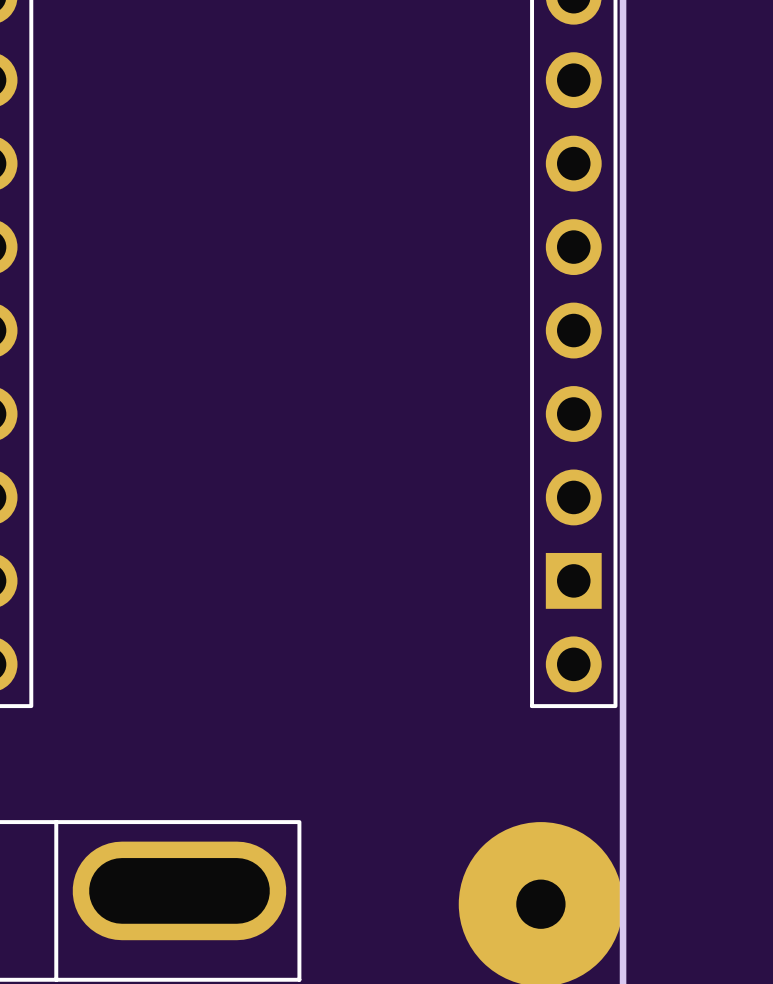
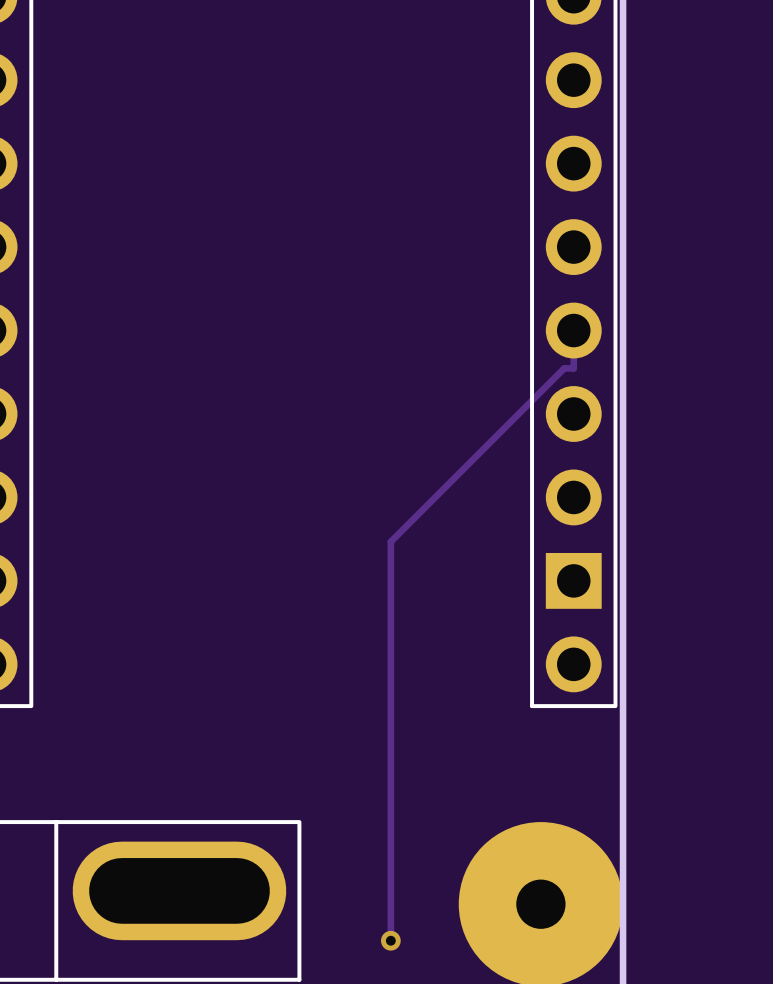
track: none -> (573, 330) (573, 368) (564, 368) (390, 541) (390, 940)
via: none -> (390, 940)

